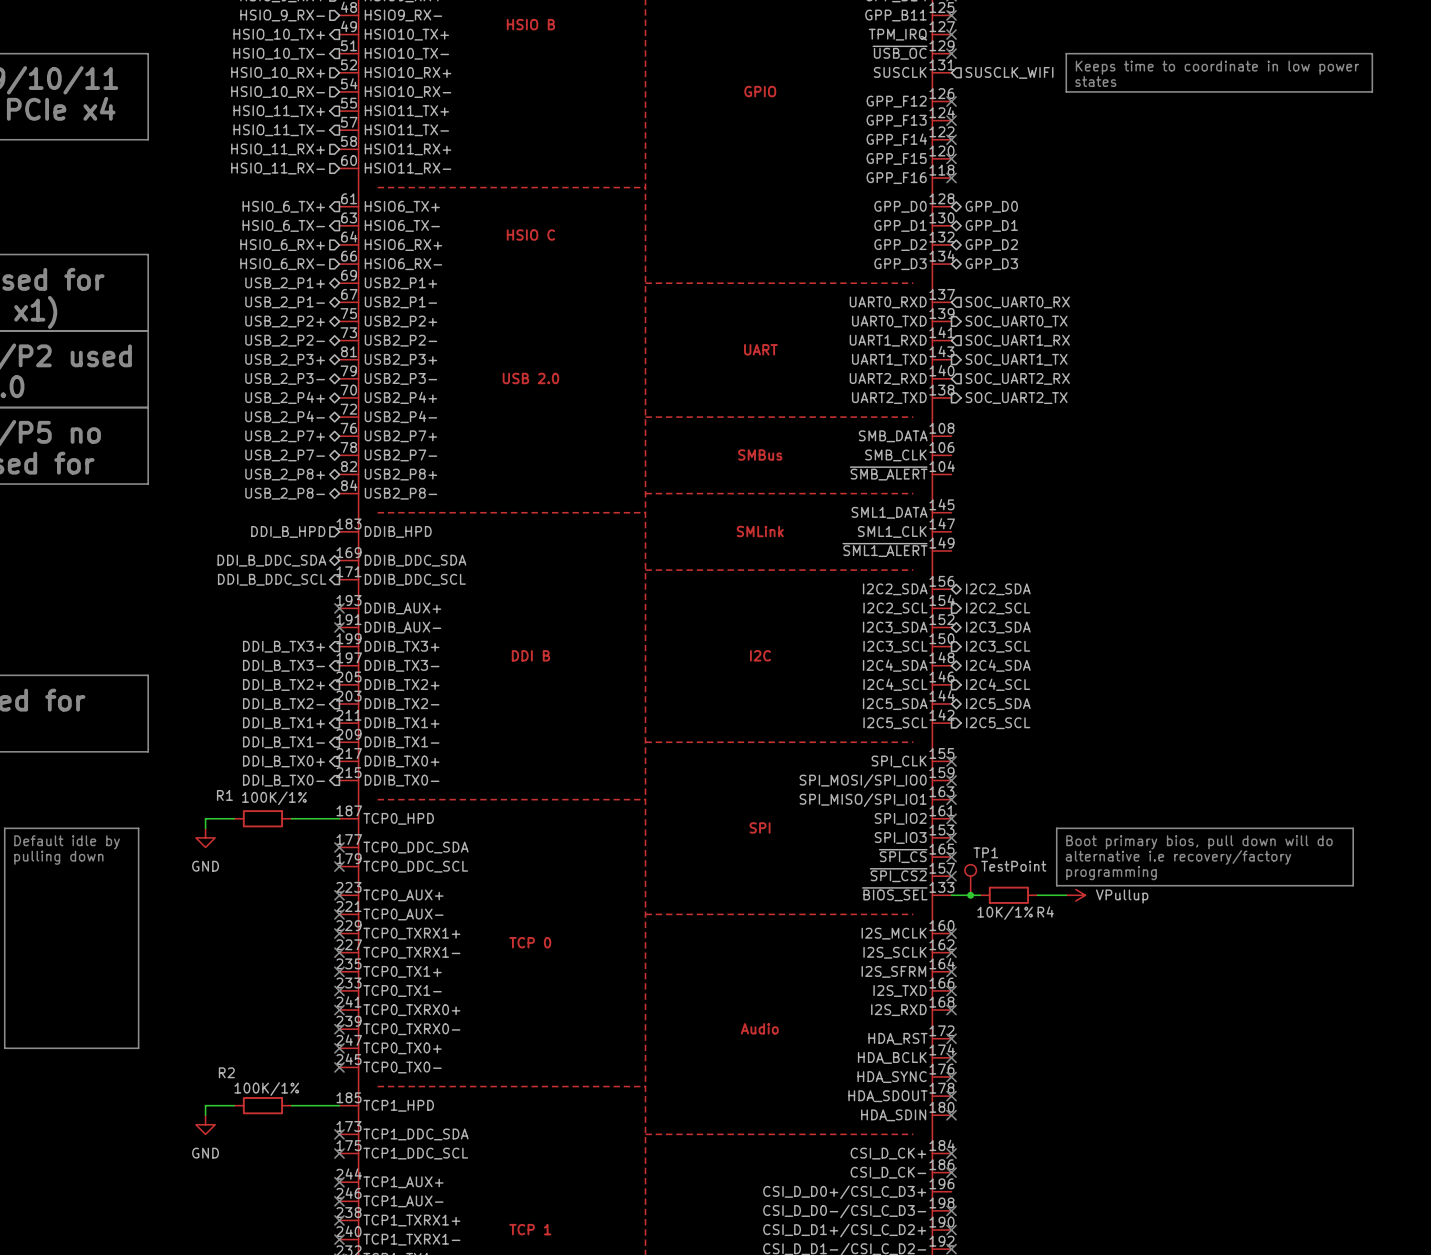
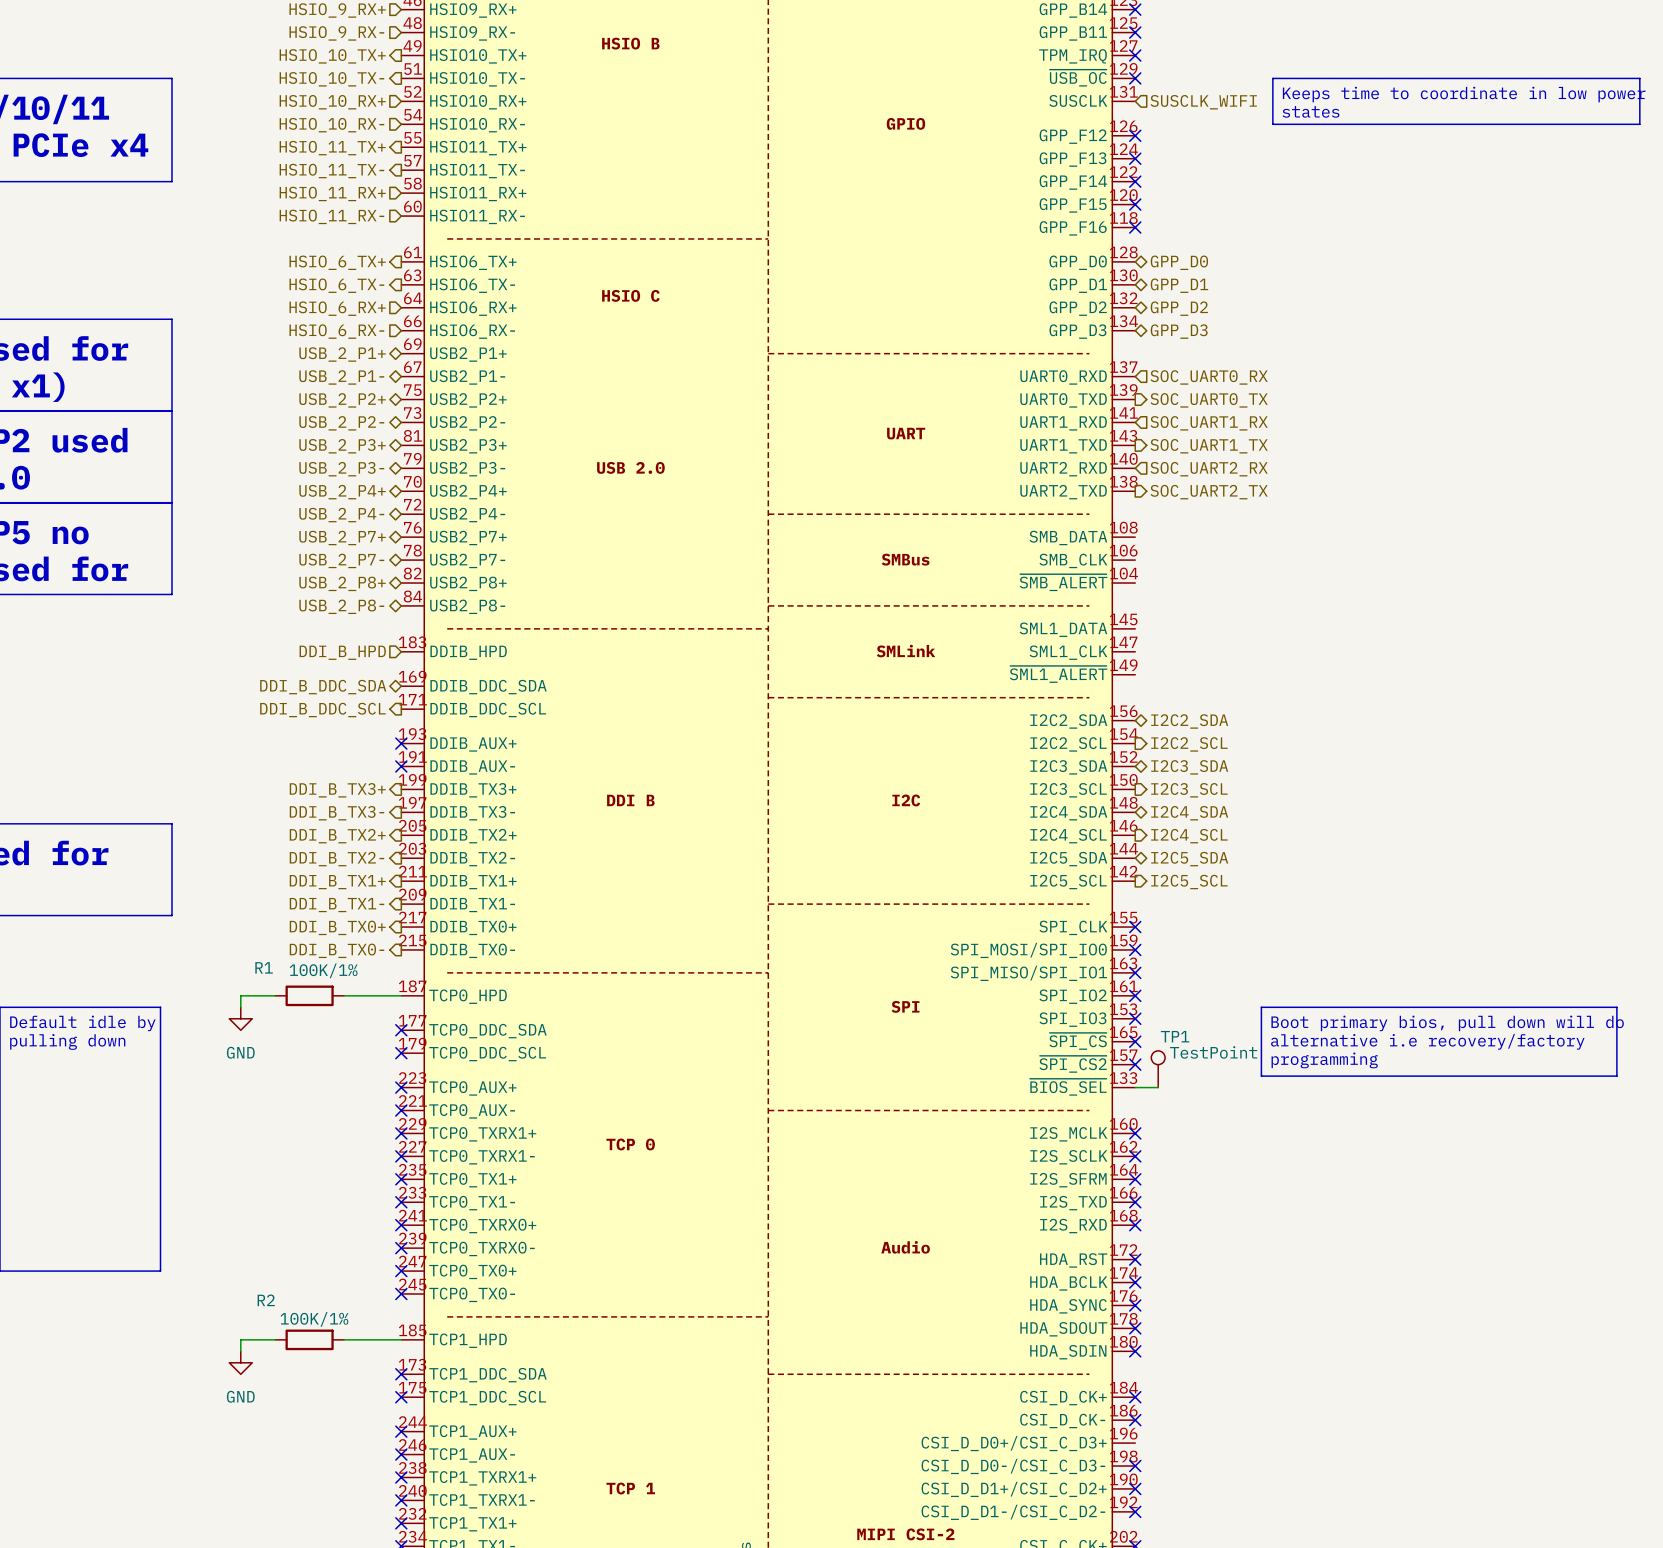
wire: (970, 895) (980, 895) -> none
junction: (970, 895) -> none
R4: 10K/1% (1008, 895) -> none
wire: (1037, 895) (1066, 895) -> none
power symbol: VPullup (1075, 895) -> none

